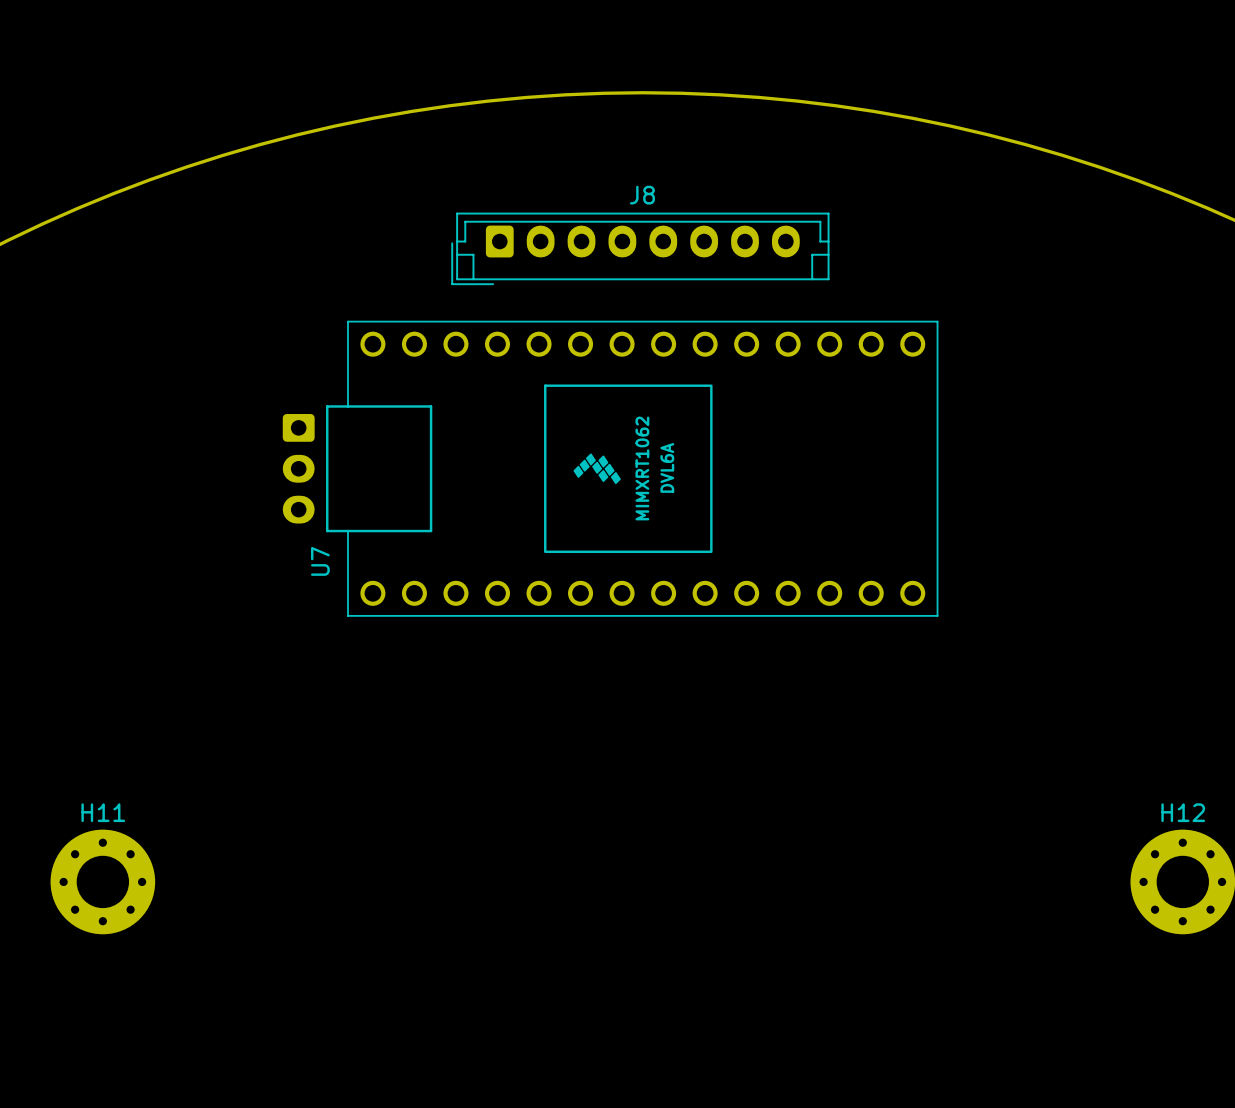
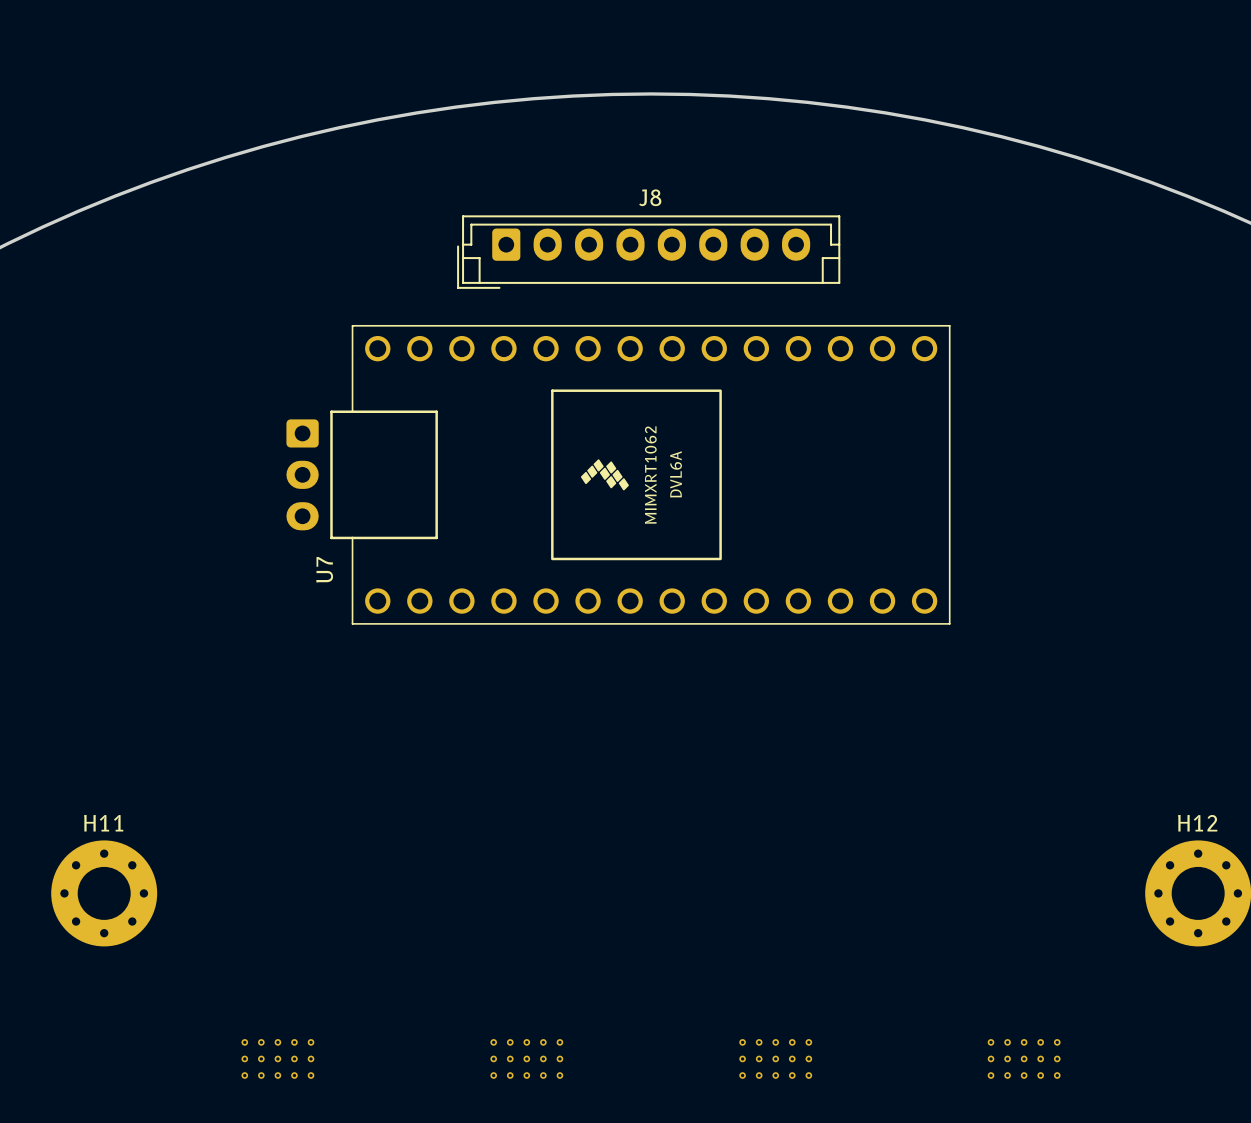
part: none -> (277, 1058)
part: none -> (526, 1058)
part: none -> (775, 1058)
part: none -> (1024, 1058)

